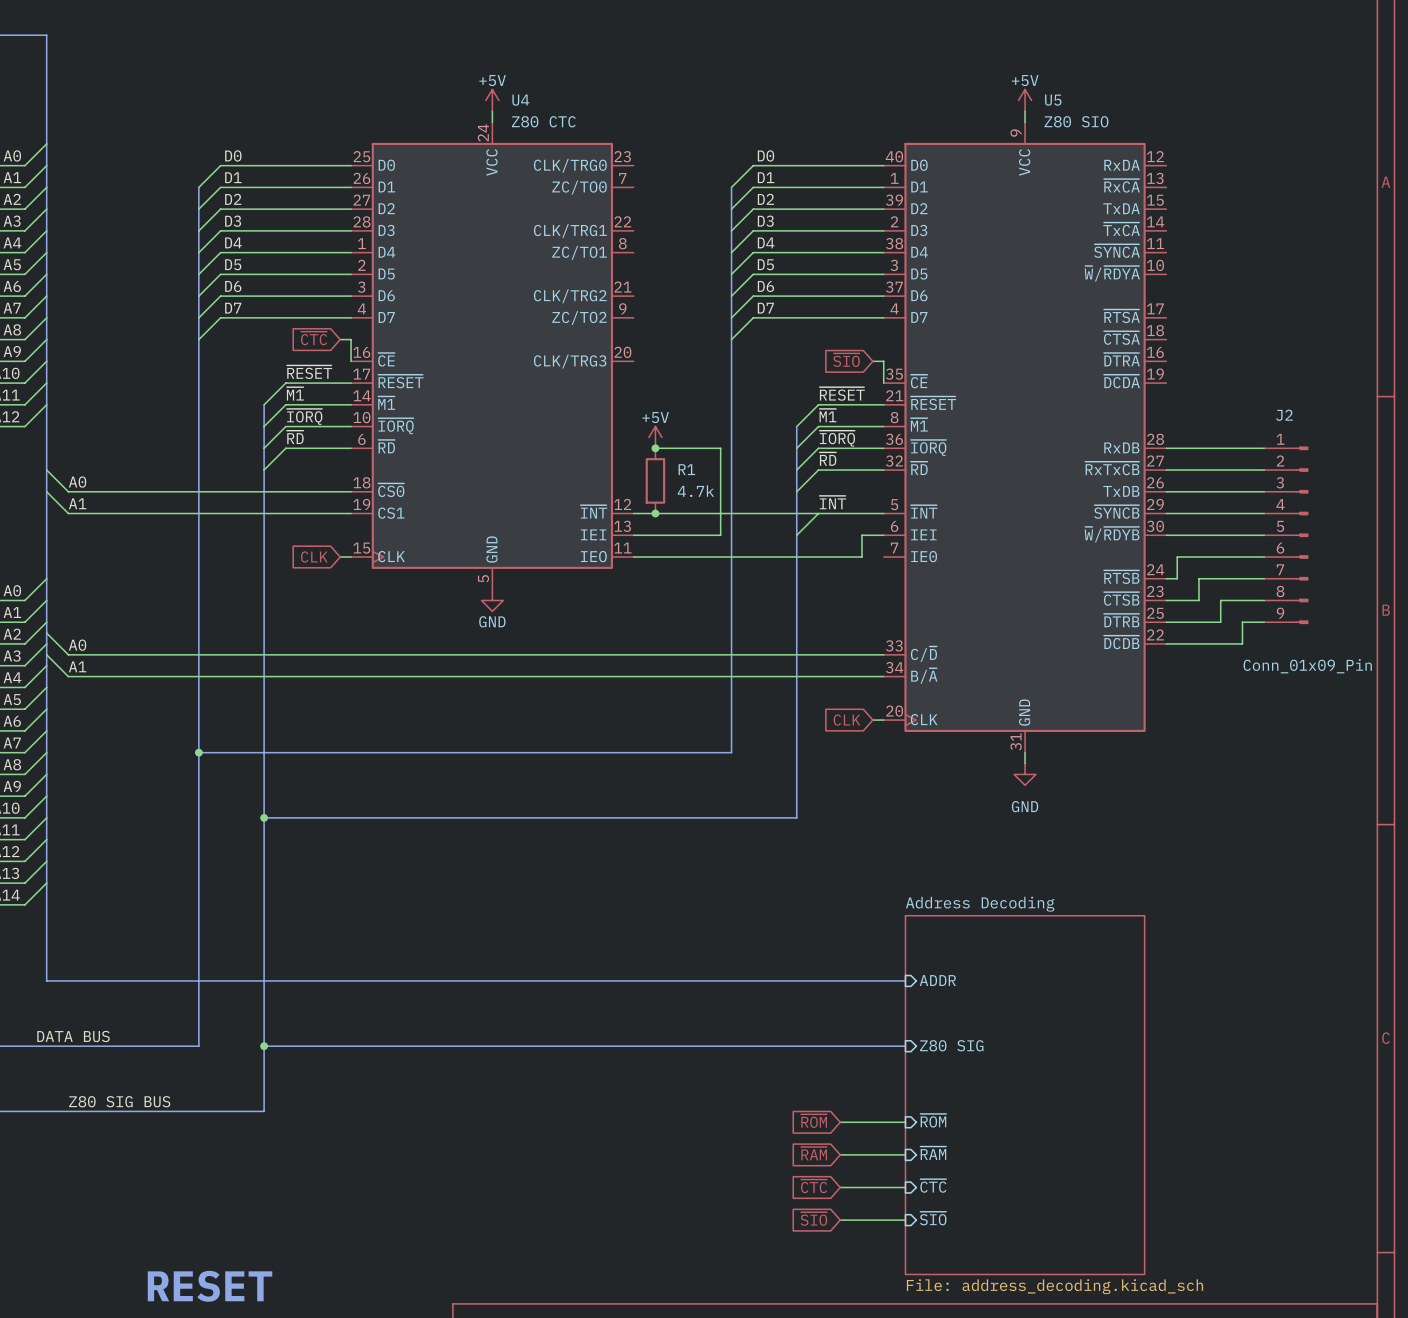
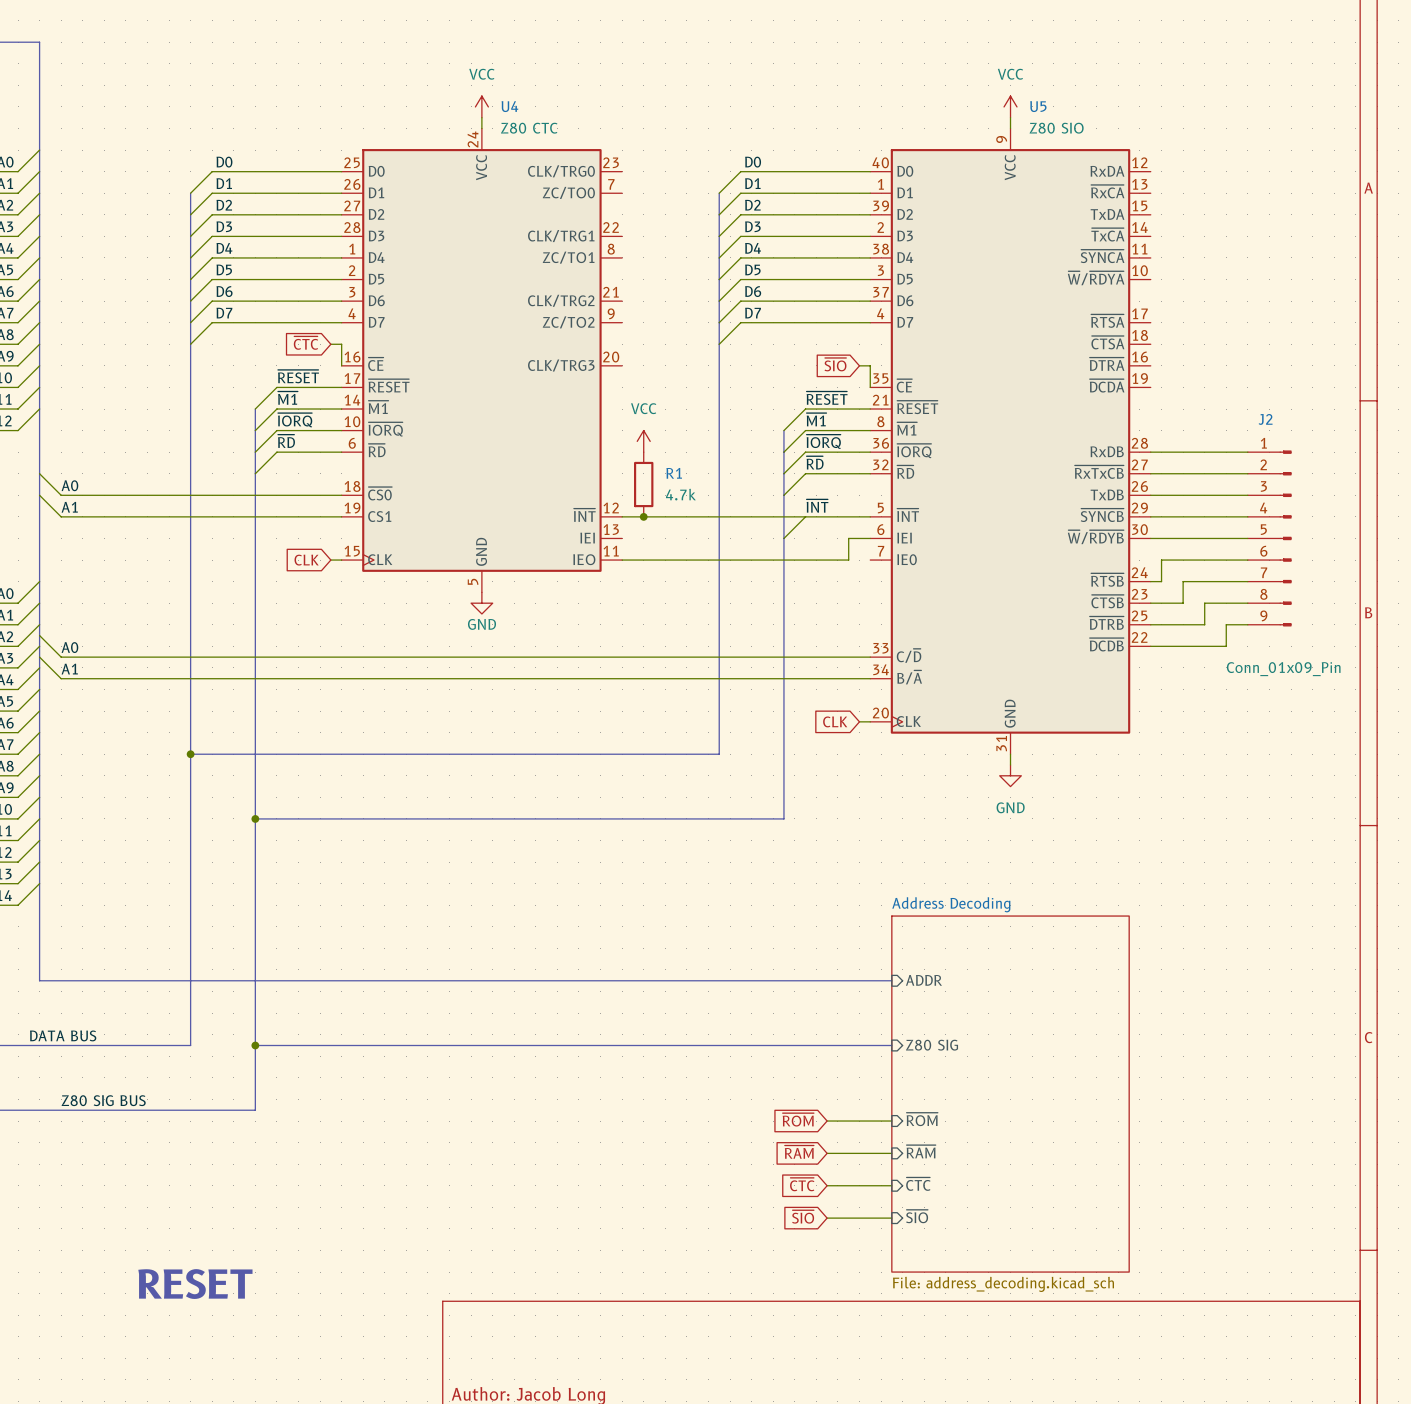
power symbol: +5V (492, 100) -> VCC (481, 106)
power symbol: +5V (1025, 100) -> VCC (1010, 106)
power symbol: +5V (655, 437) -> VCC (643, 441)
wire: (655, 448) (720, 448) (720, 535) (633, 535) -> none
junction: (655, 448) -> none

